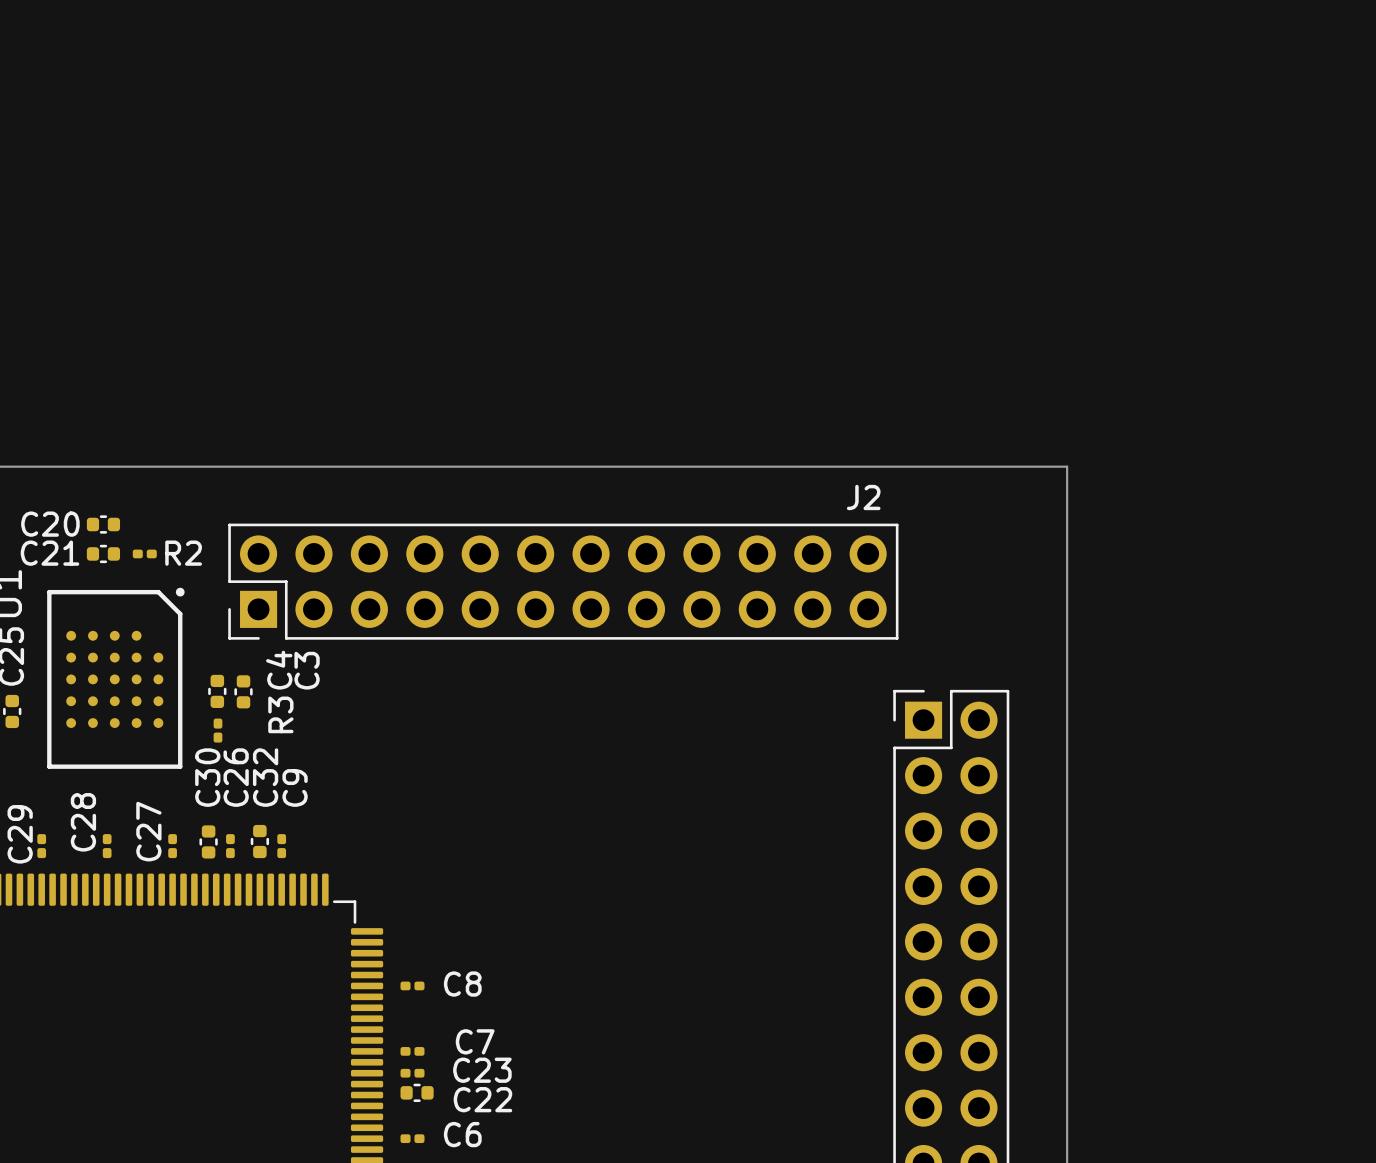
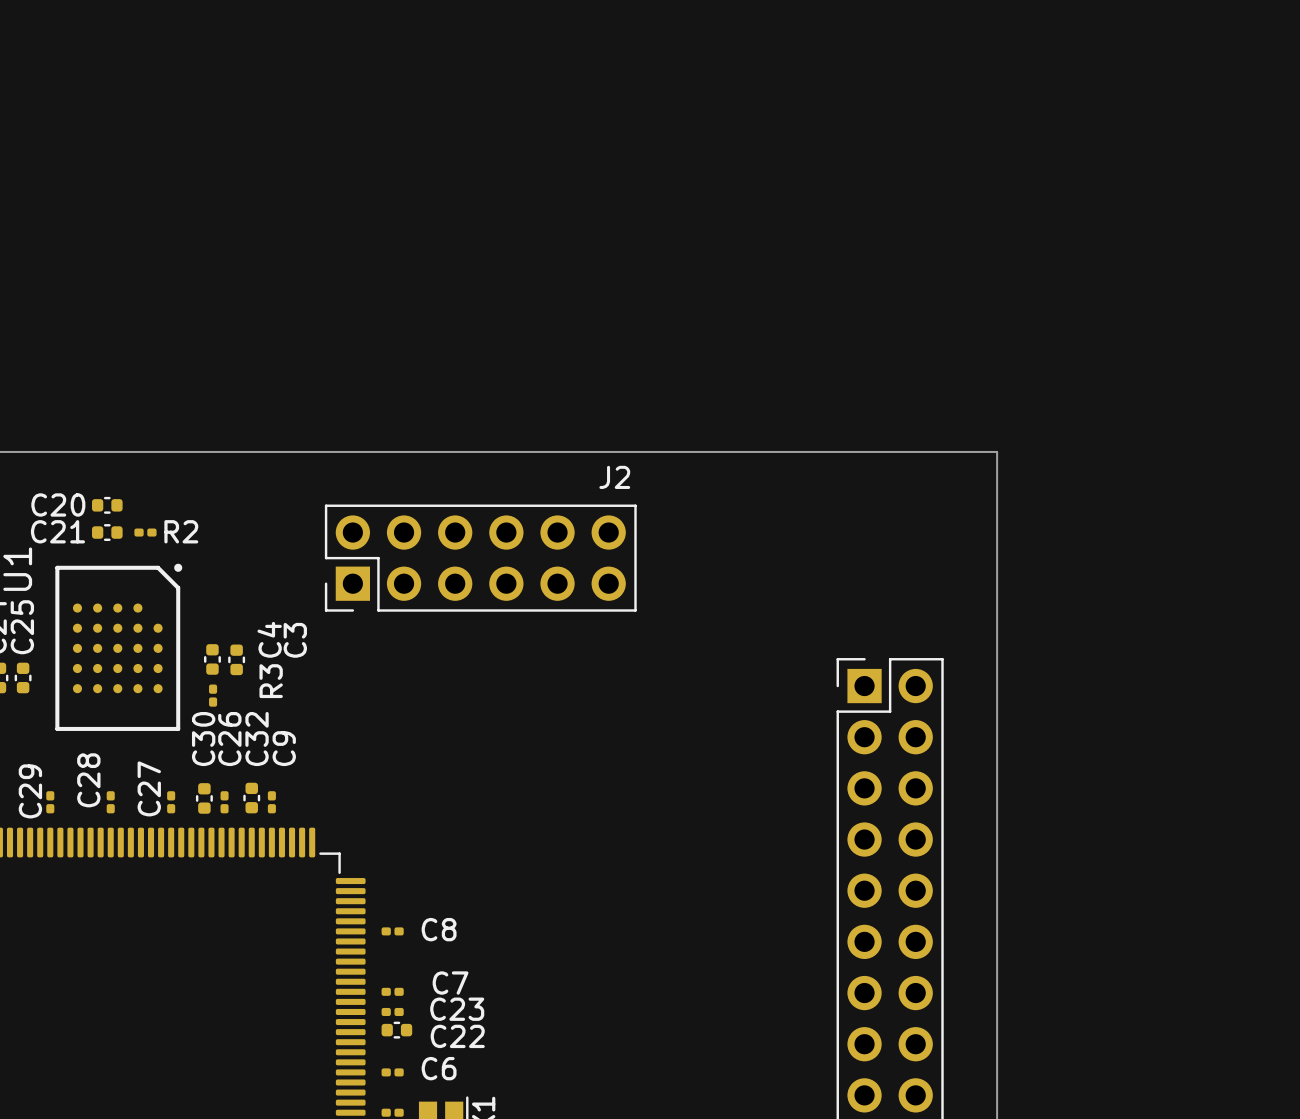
J2 name position: J2 (863, 497) -> J2 (614, 477)
J2 footprint: [228, 523, 899, 640] -> [324, 504, 637, 612]

